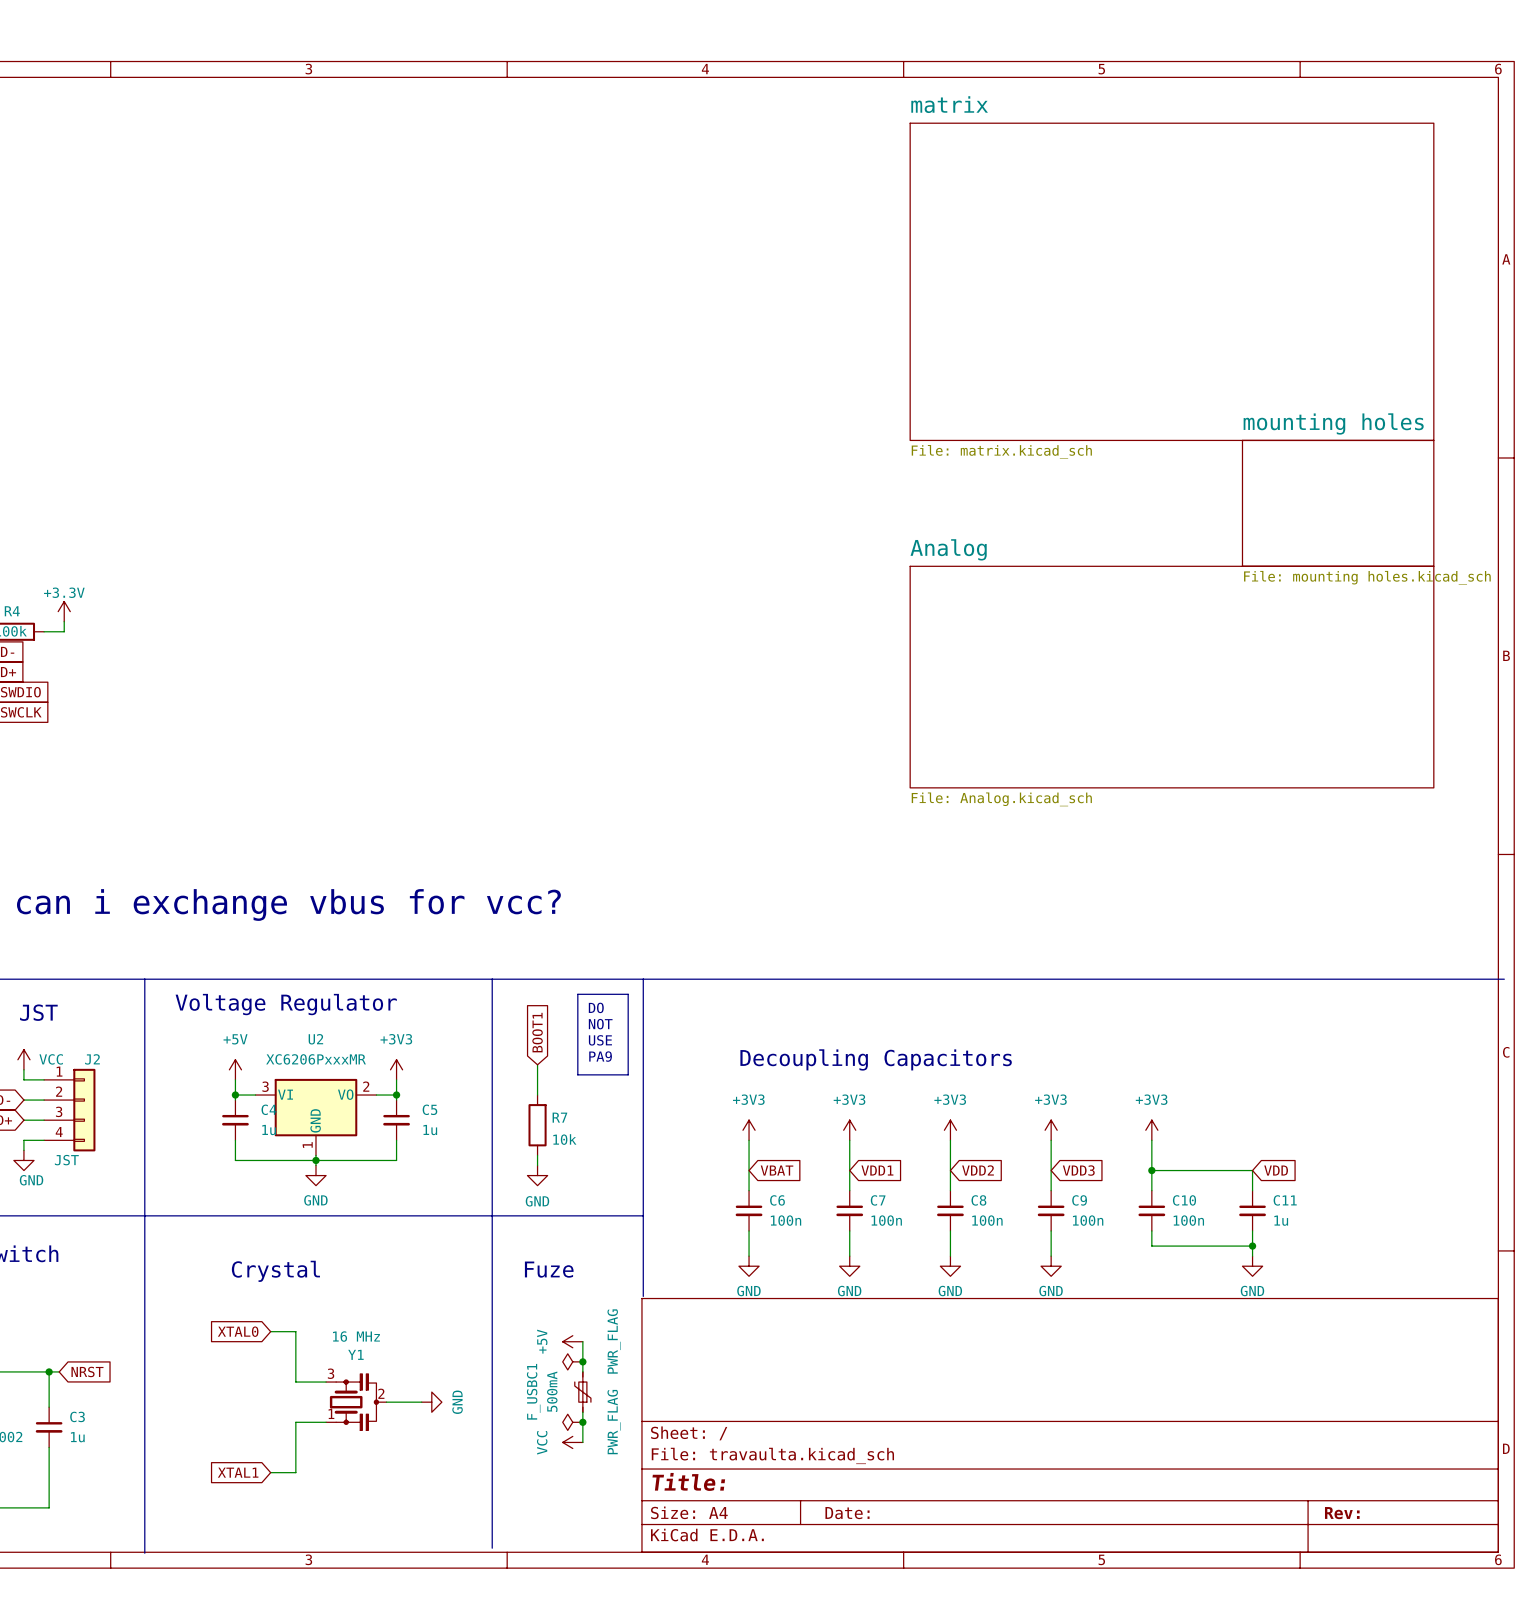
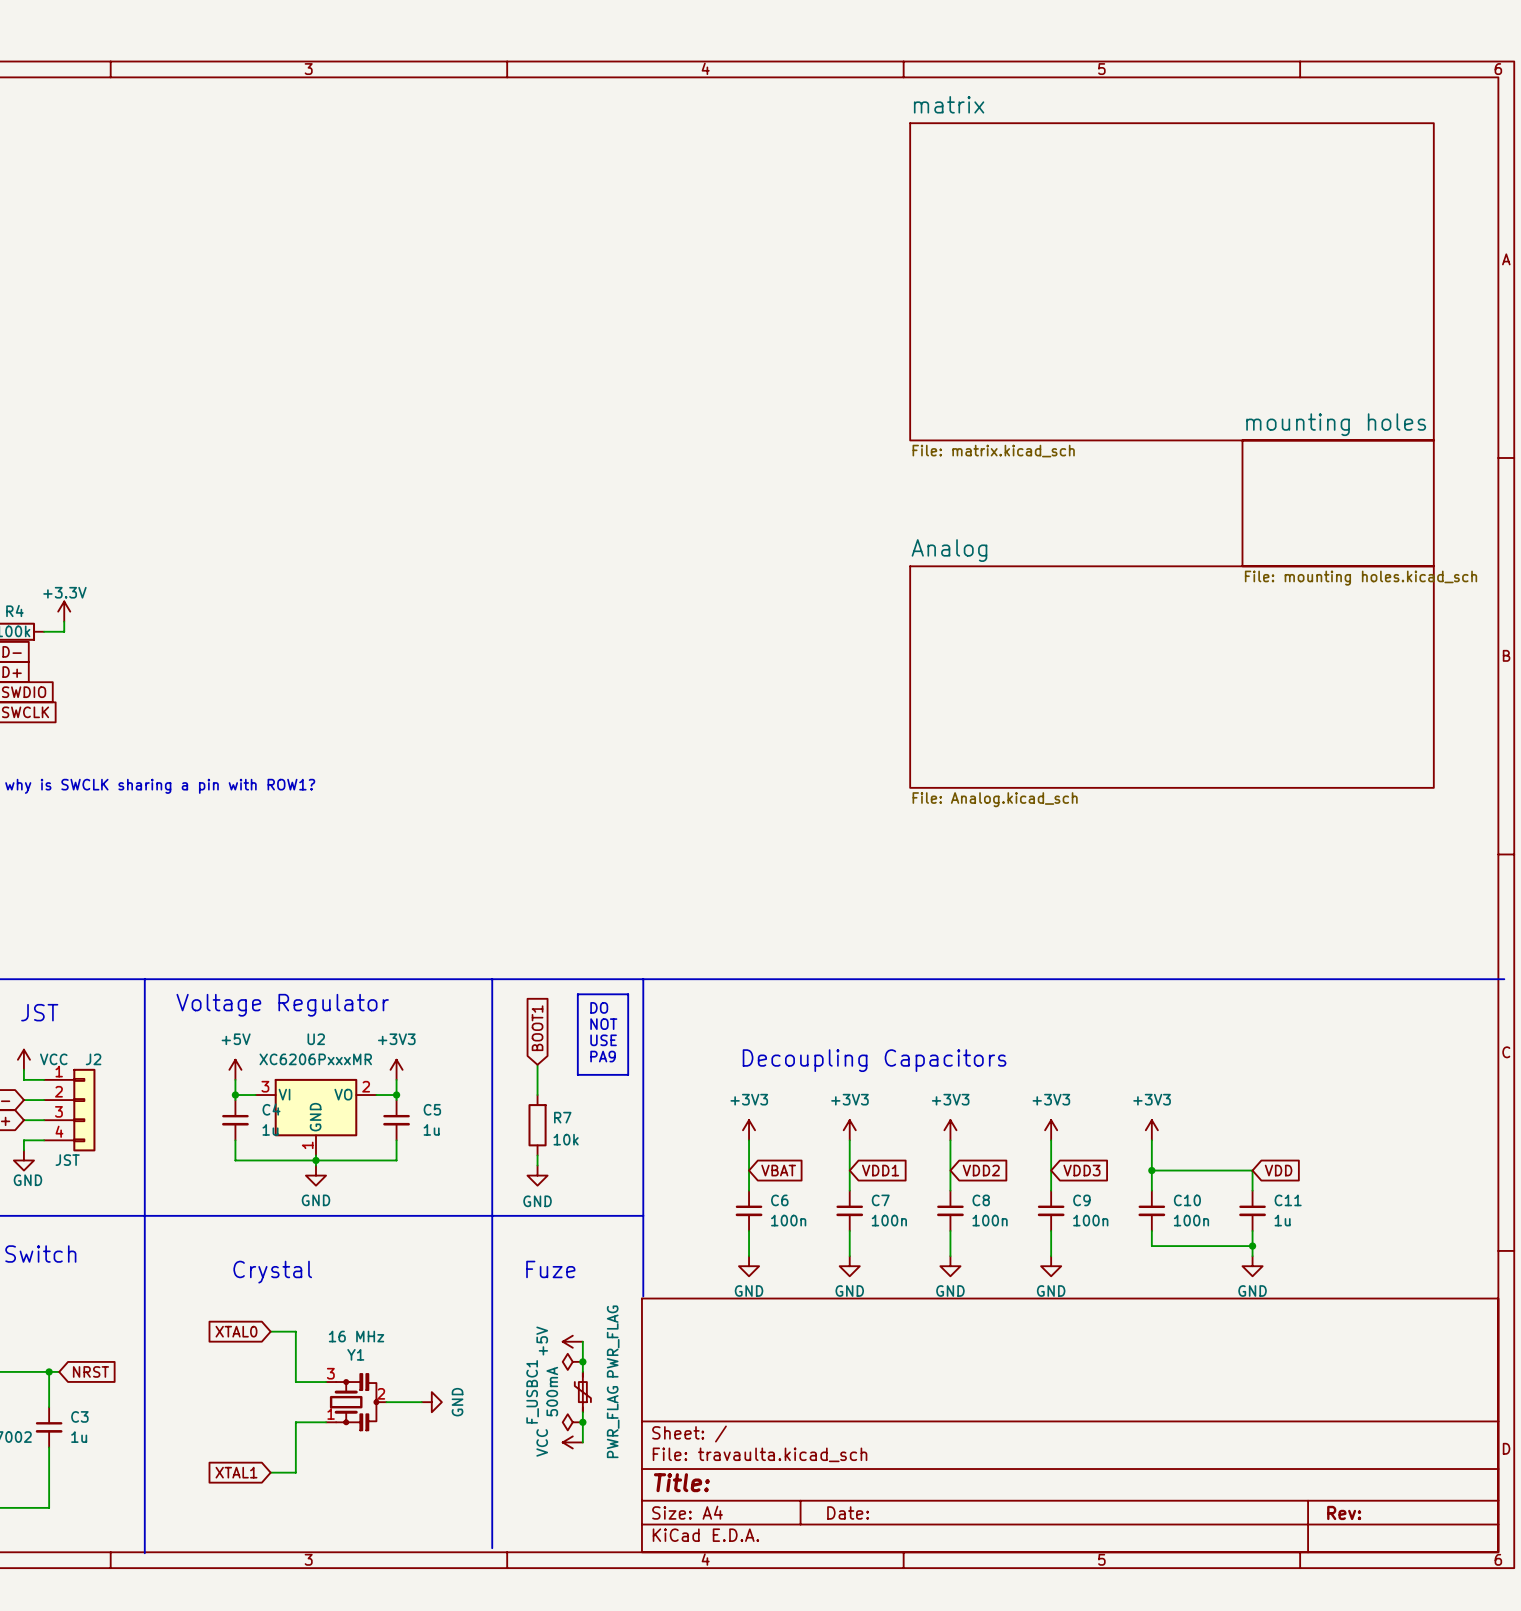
text: none -> why is SWCLK sharing a pin with ROW1? (160, 786)
text: can i exchange vbus for vcc? (288, 904) -> none

